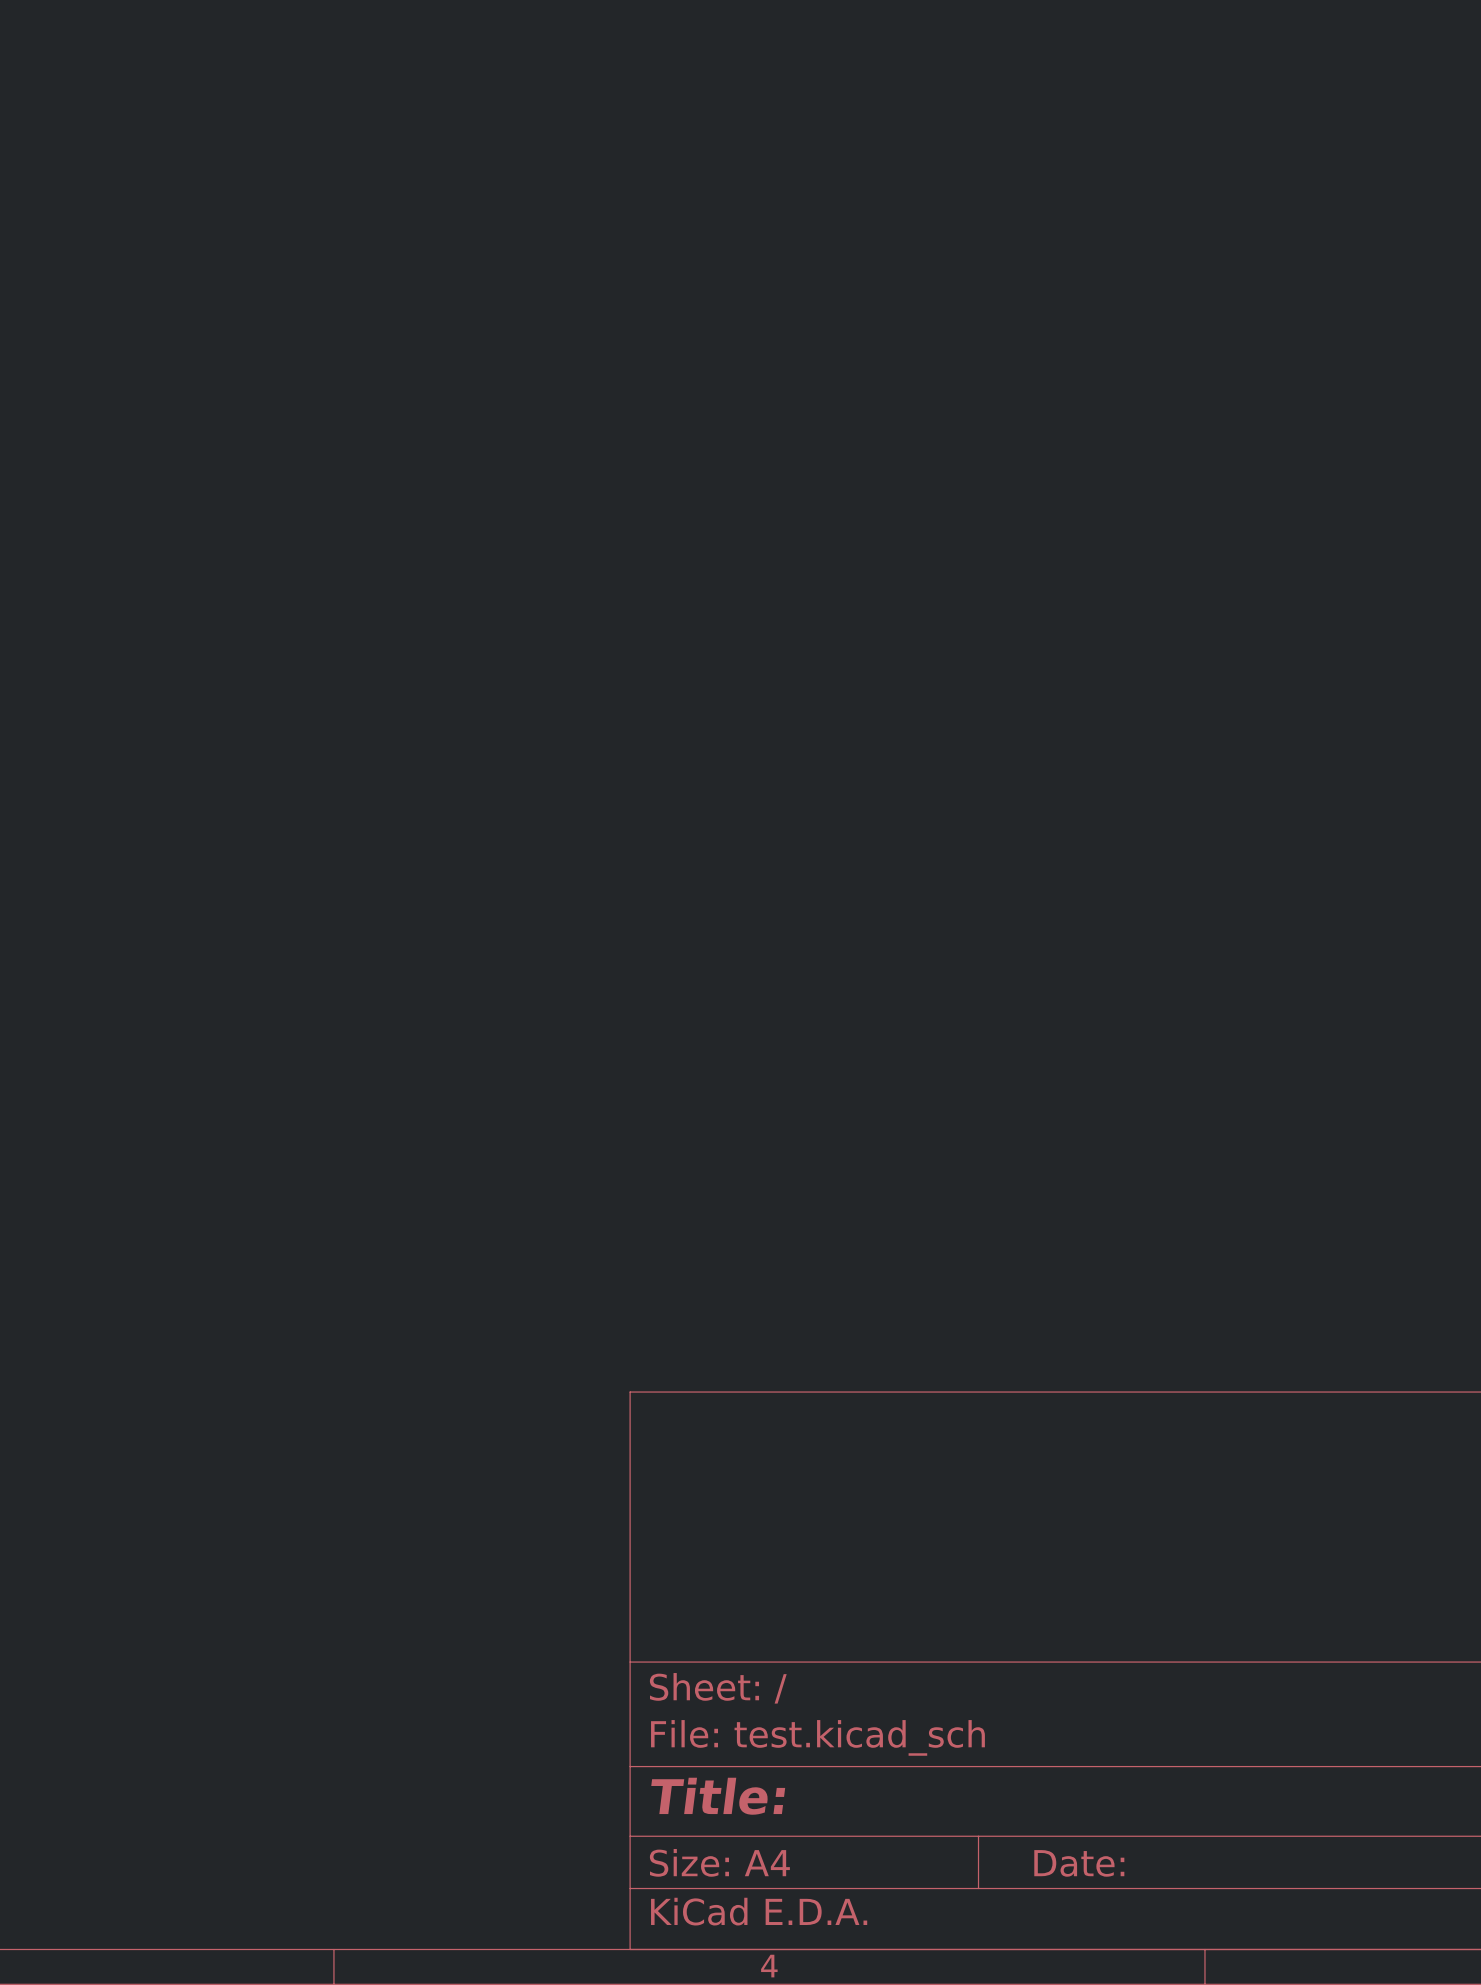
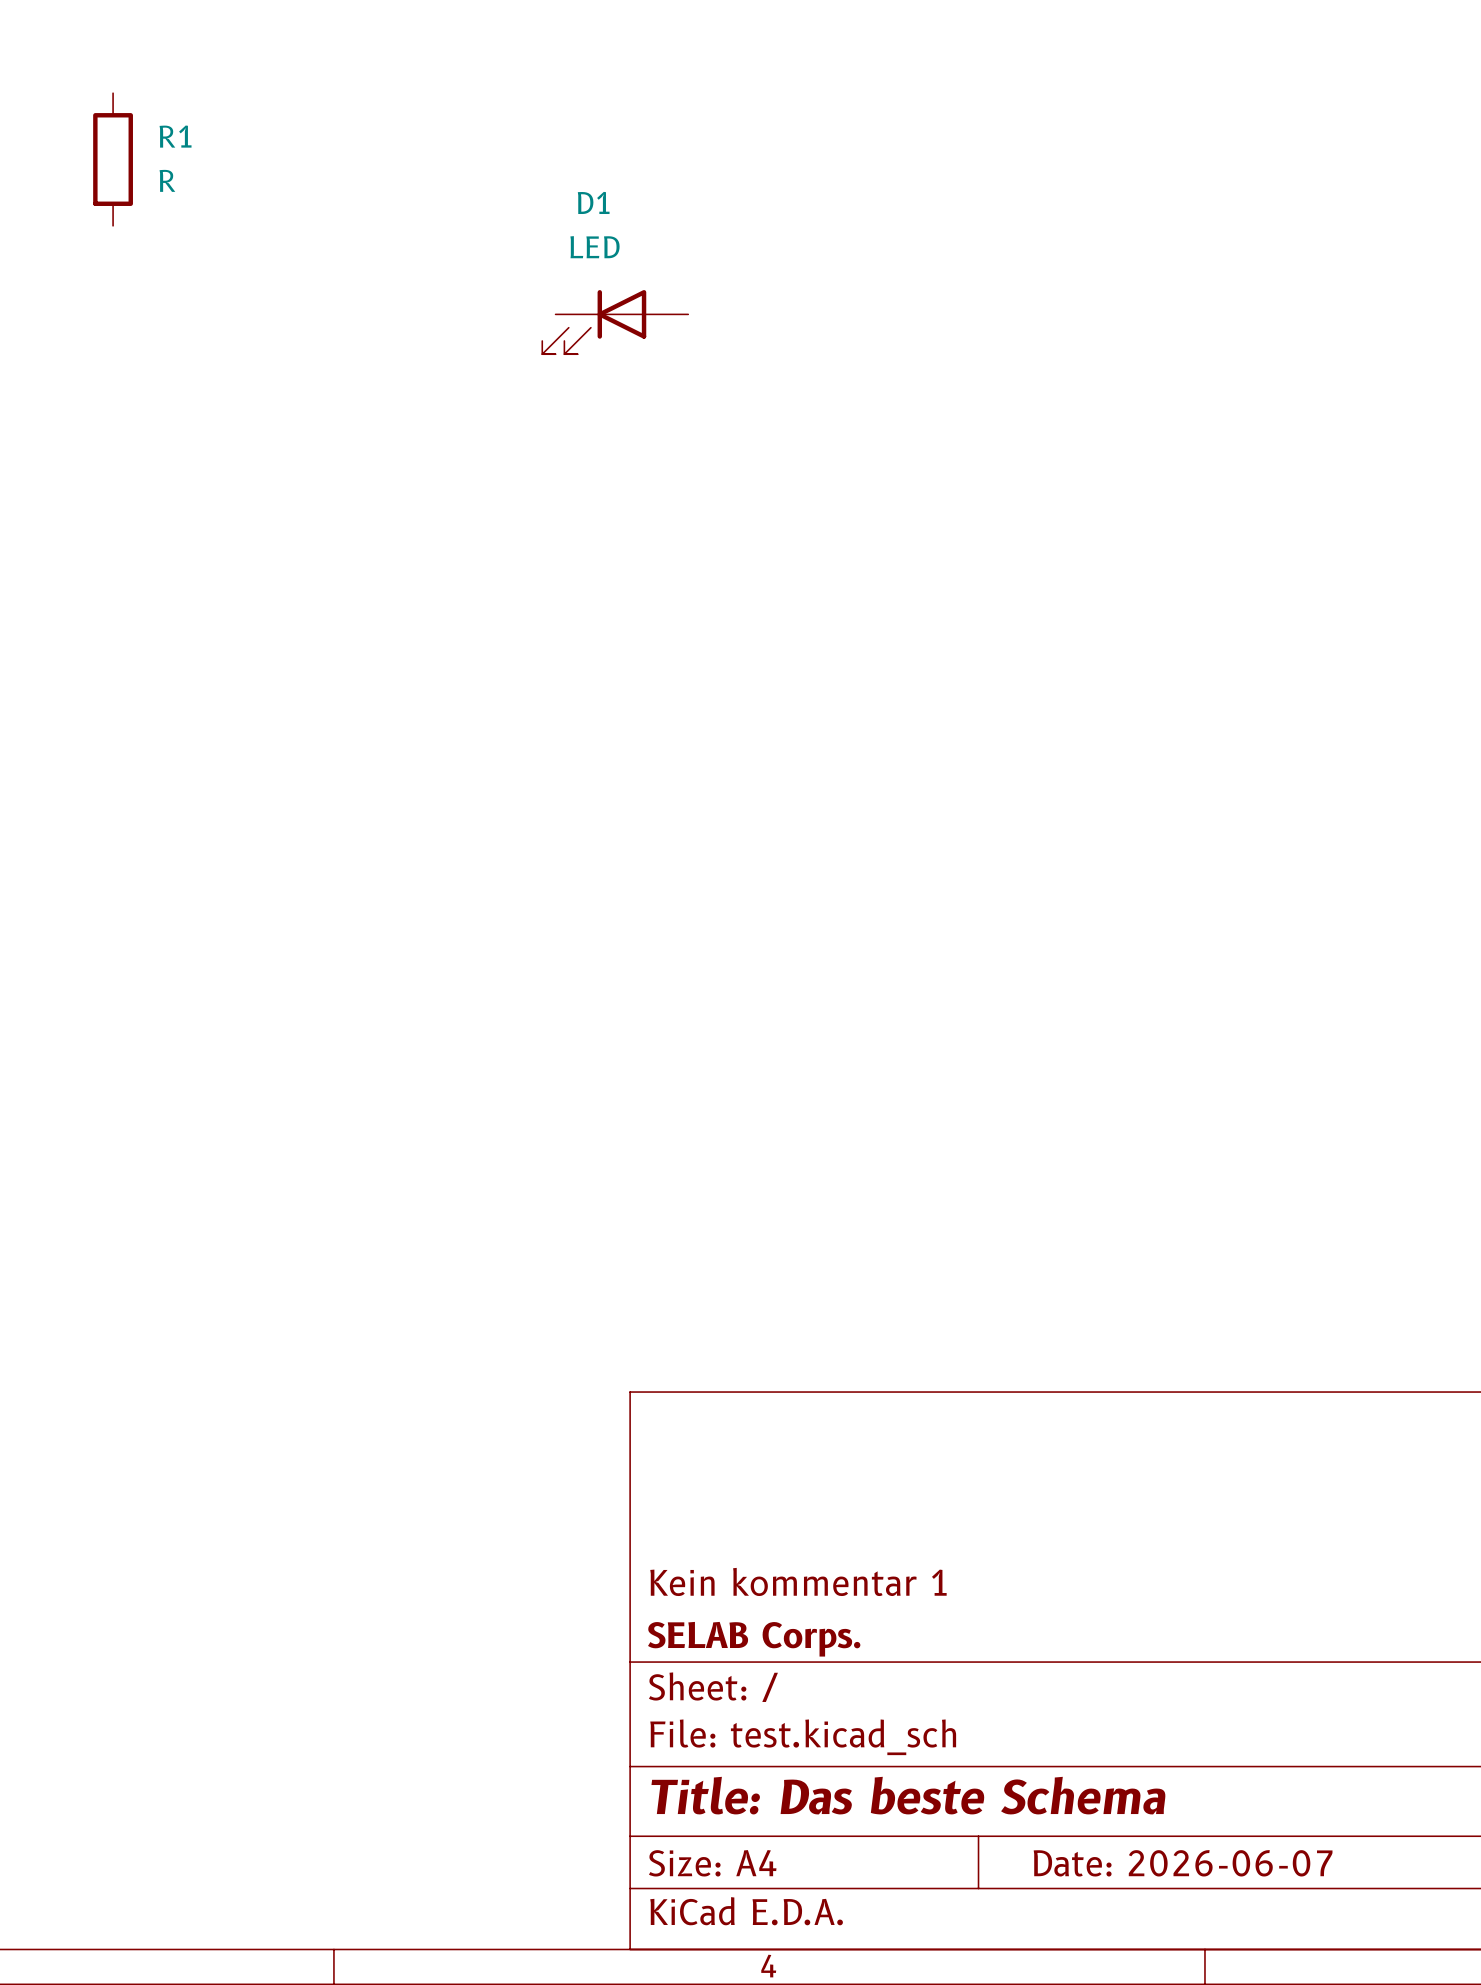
R1: none -> R (113, 159)
D1: none -> LED (615, 322)
title block: none -> Kein kommentar 1 (798, 1581)
title block: none -> SELAB Corps. (754, 1639)
title block: Title: (718, 1796) -> Title: Das beste Schema (908, 1795)
title block: Date: (1079, 1863) -> Date: 2026-06-07 (1183, 1863)

